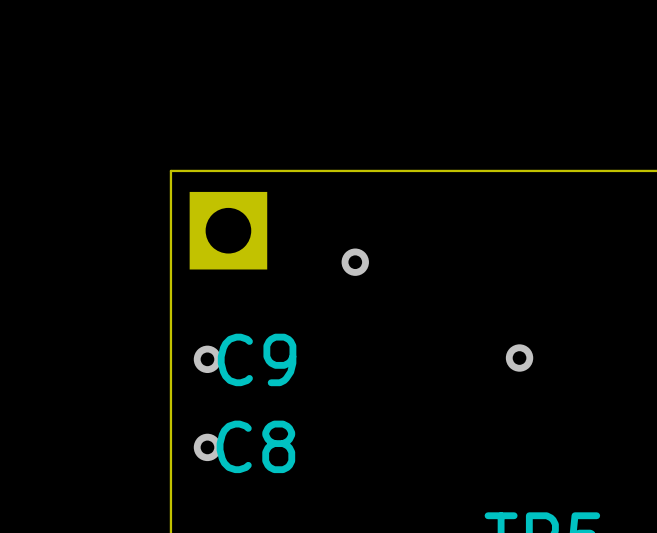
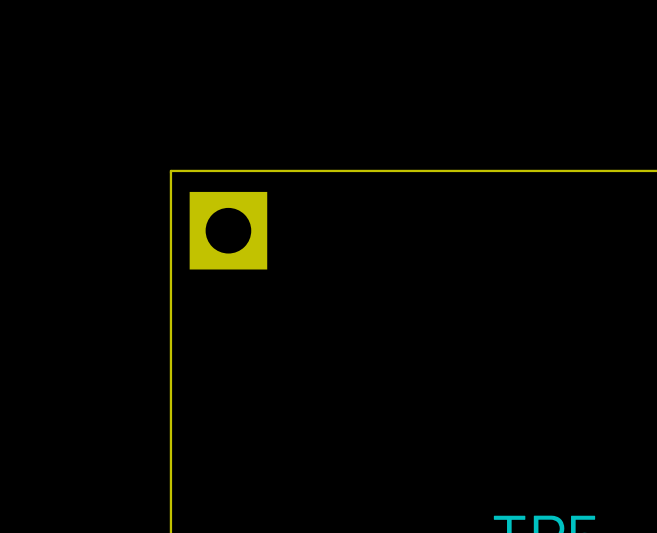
via: (355, 262) -> none
via: (519, 358) -> none
via: (207, 359) -> none
C9: (257, 359) -> none
C8: (255, 446) -> none
via: (207, 447) -> none

